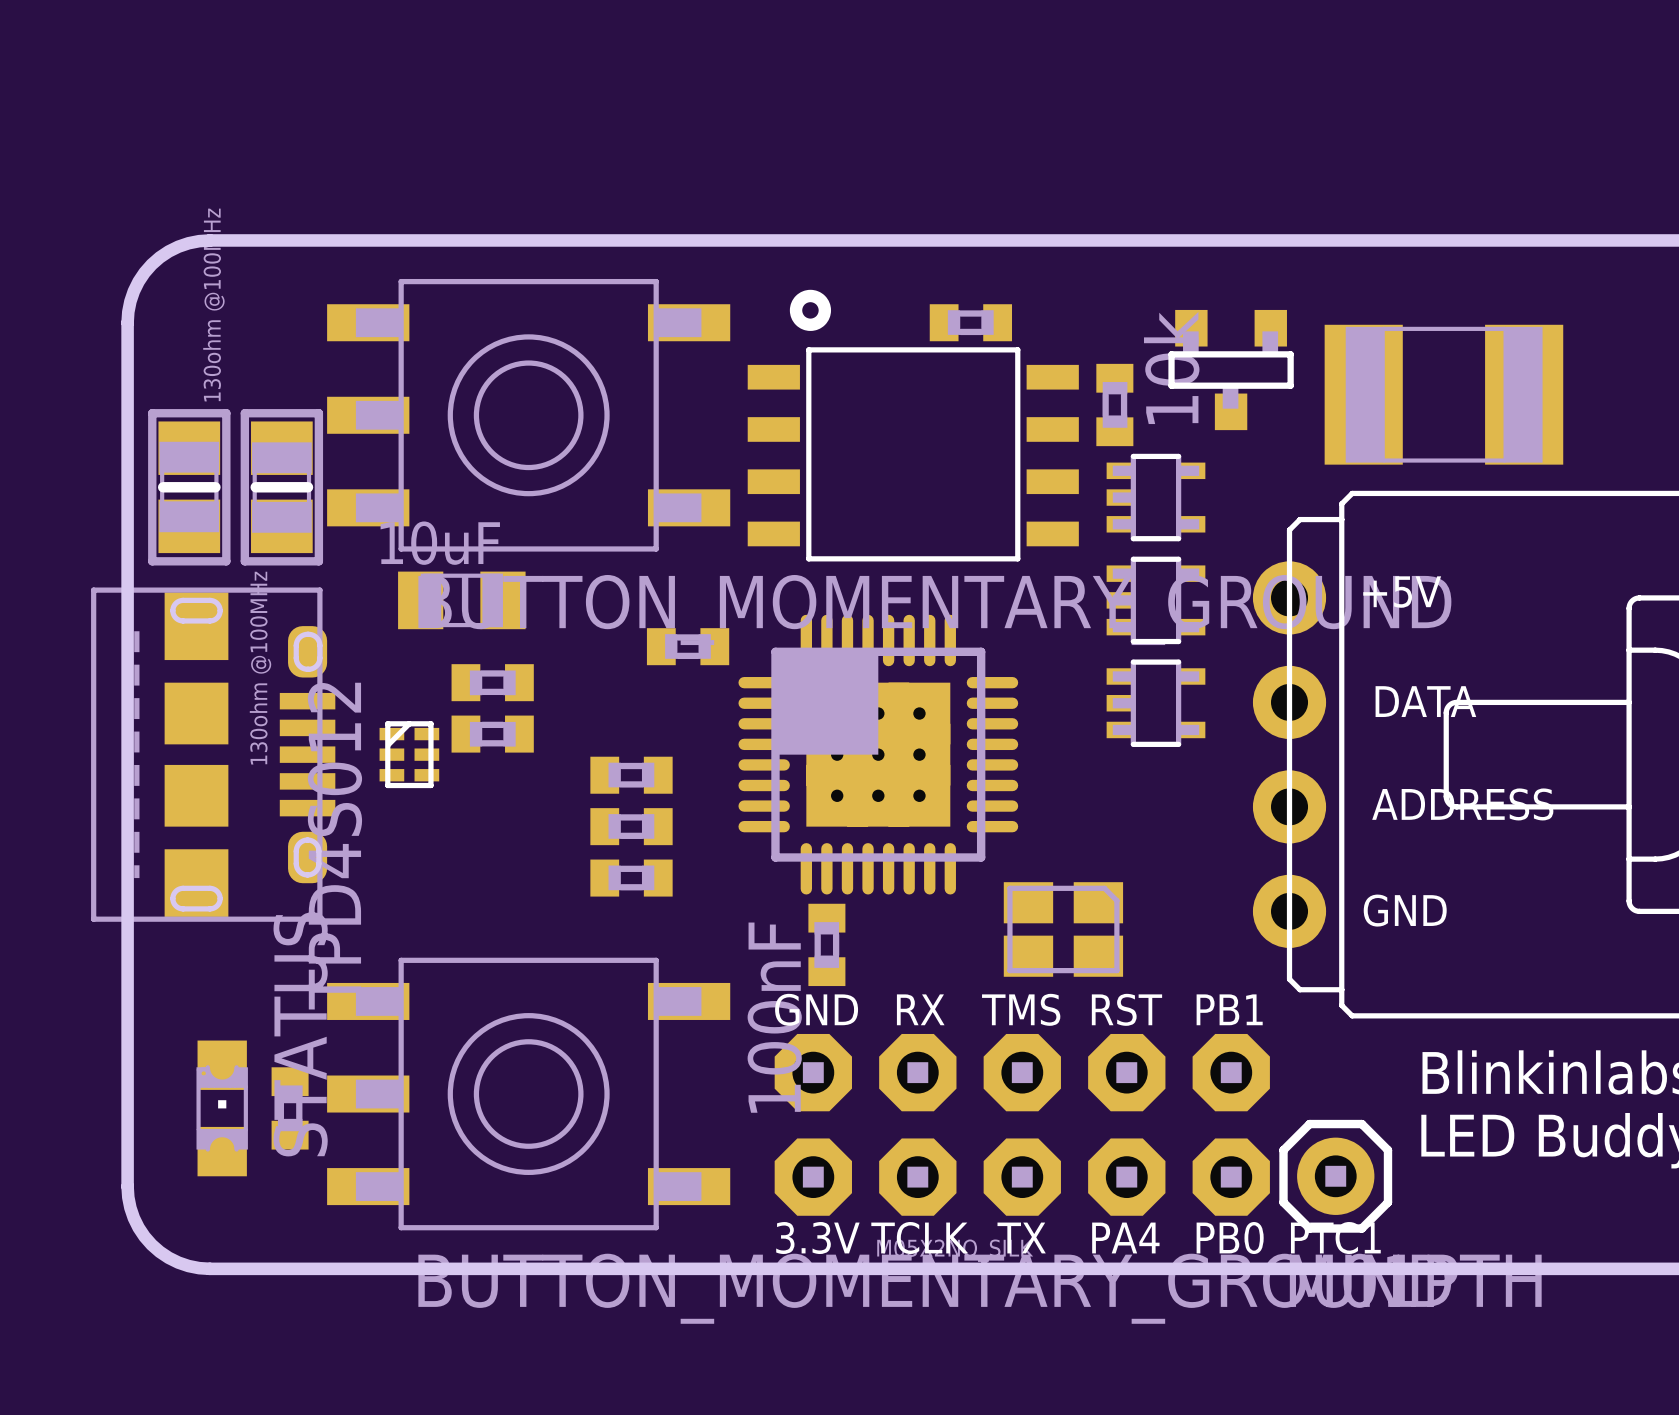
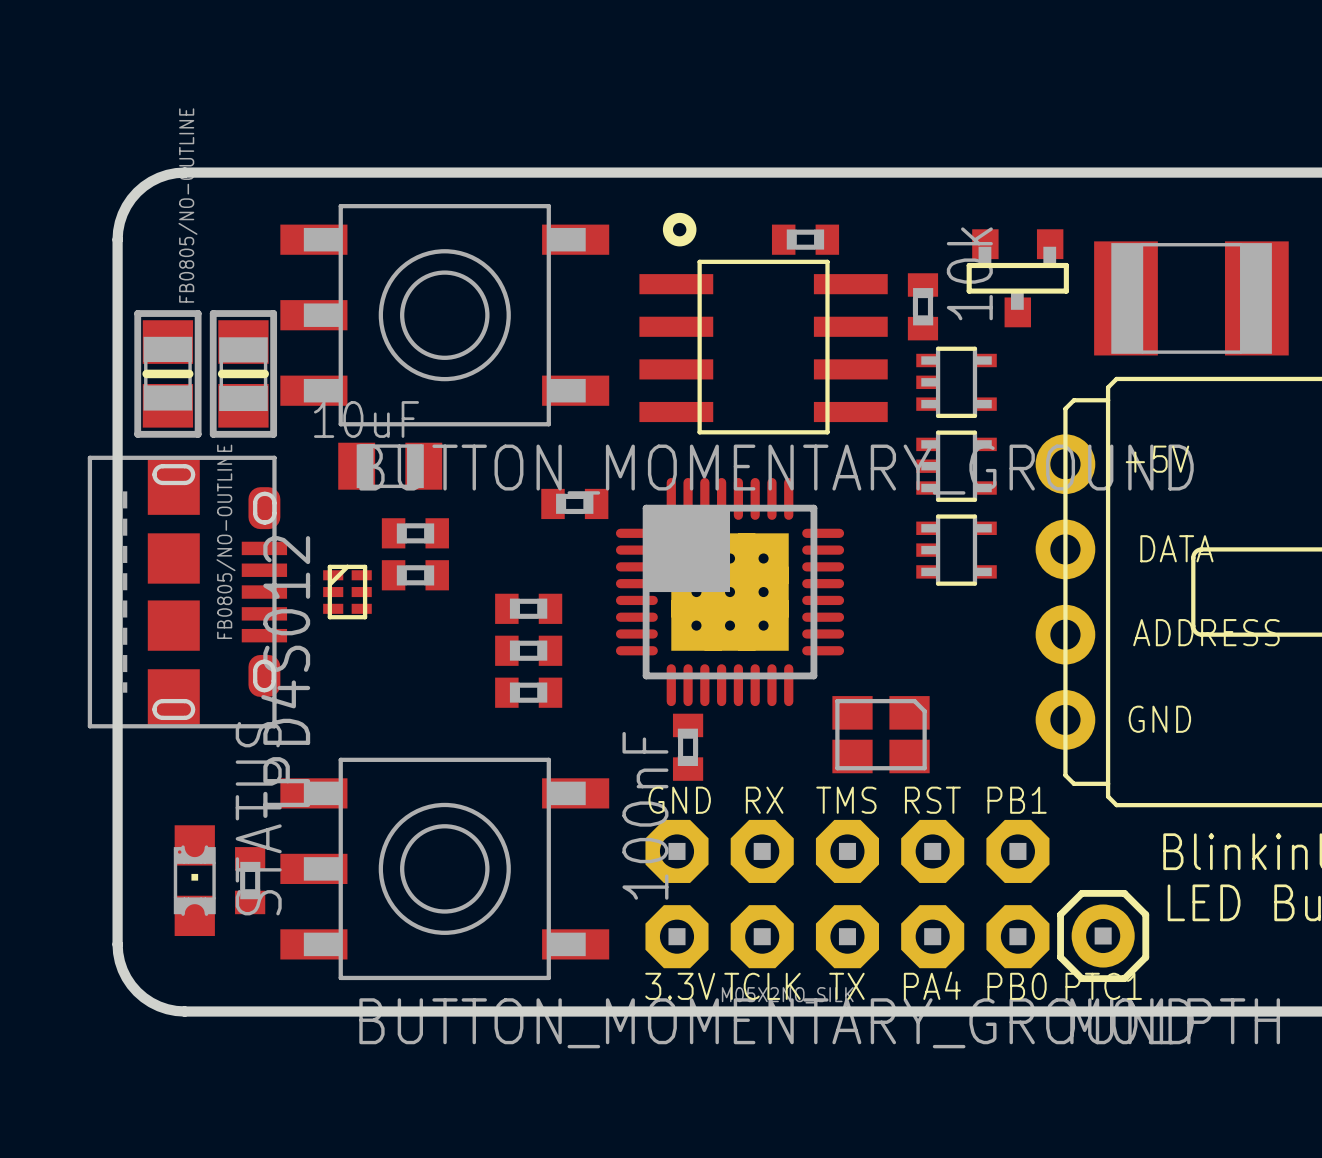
part footprint: [747, 289, 1079, 562] -> [639, 212, 888, 435]
part value: 130ohm @100MHz (213, 305) -> FB0805/NO-OUTLINE (187, 205)
part value: 130ohm @100MHz (260, 668) -> FB0805/NO-OUTLINE (225, 541)

